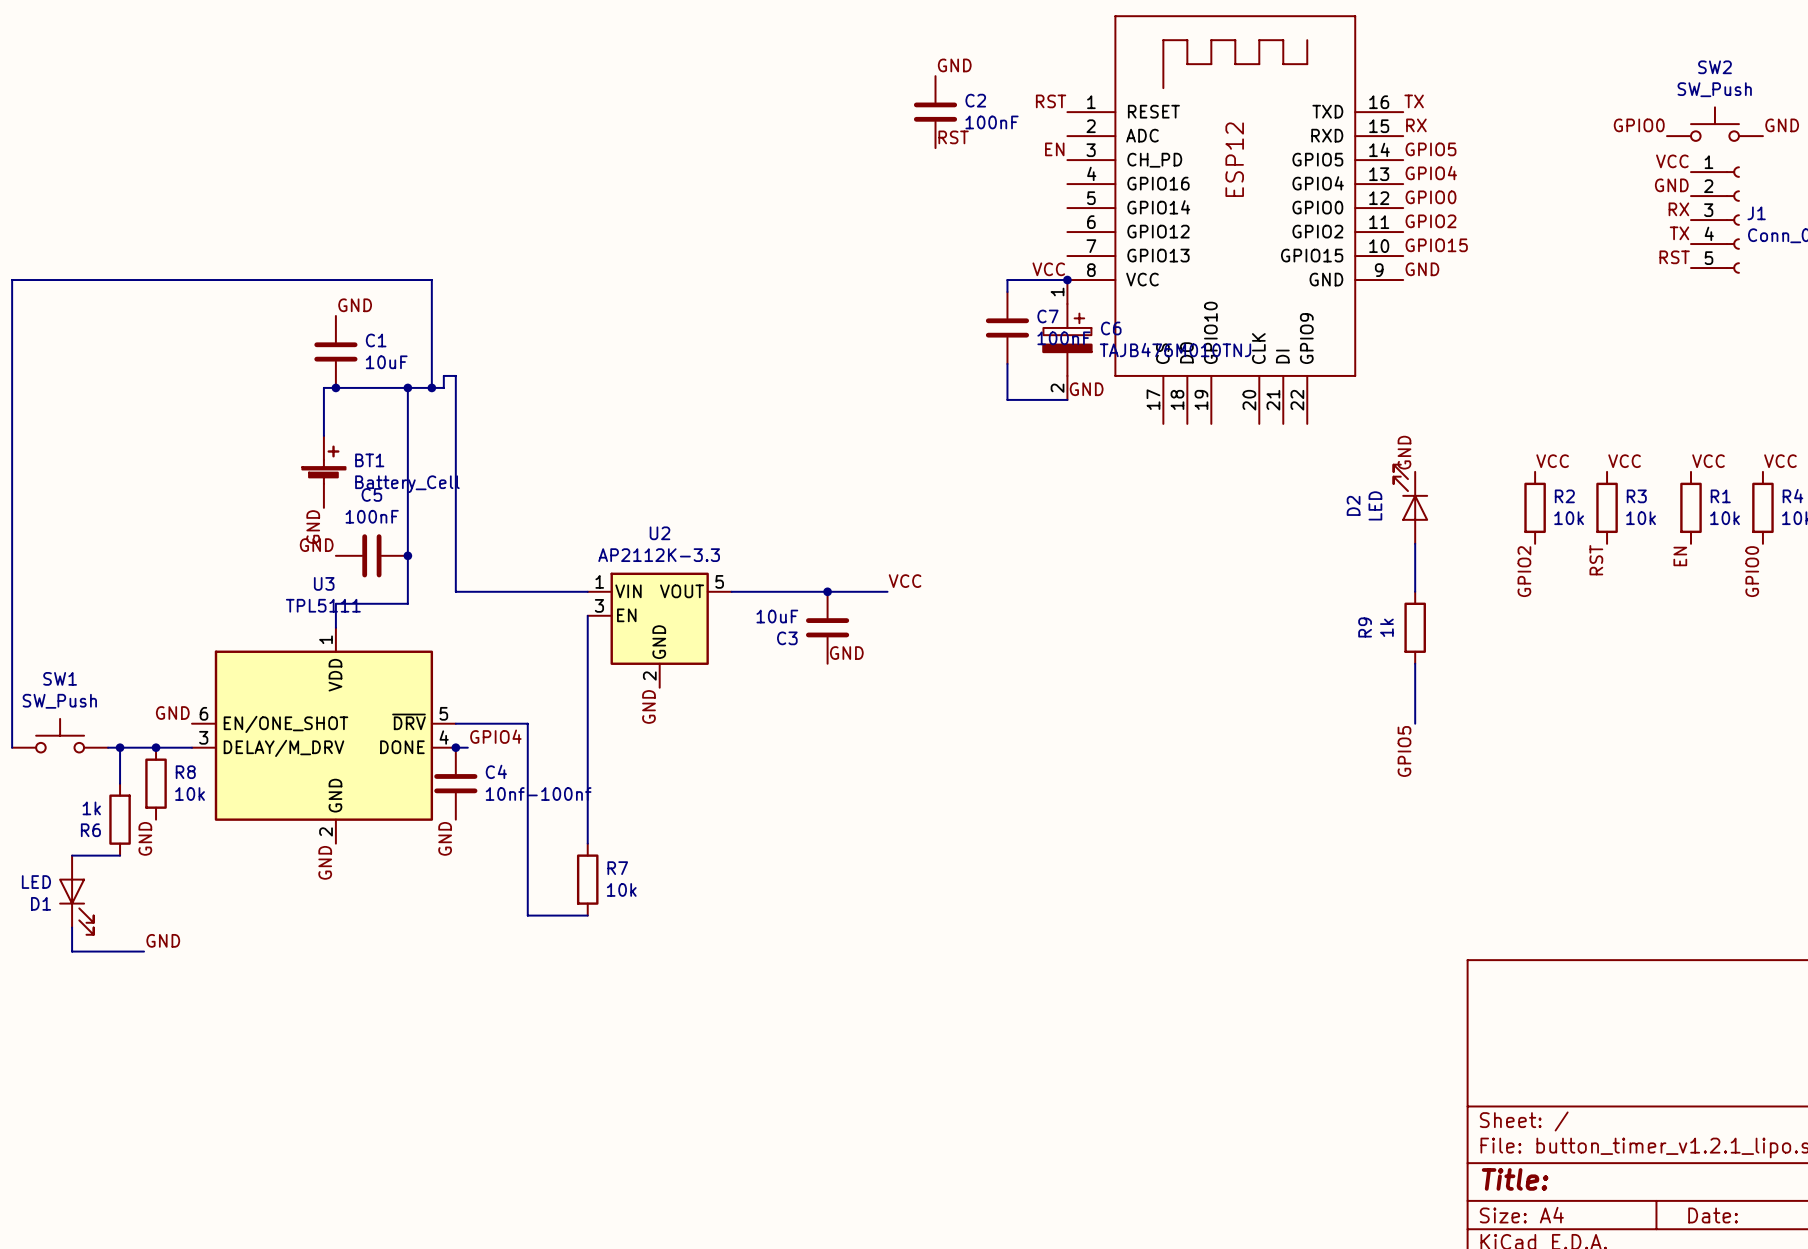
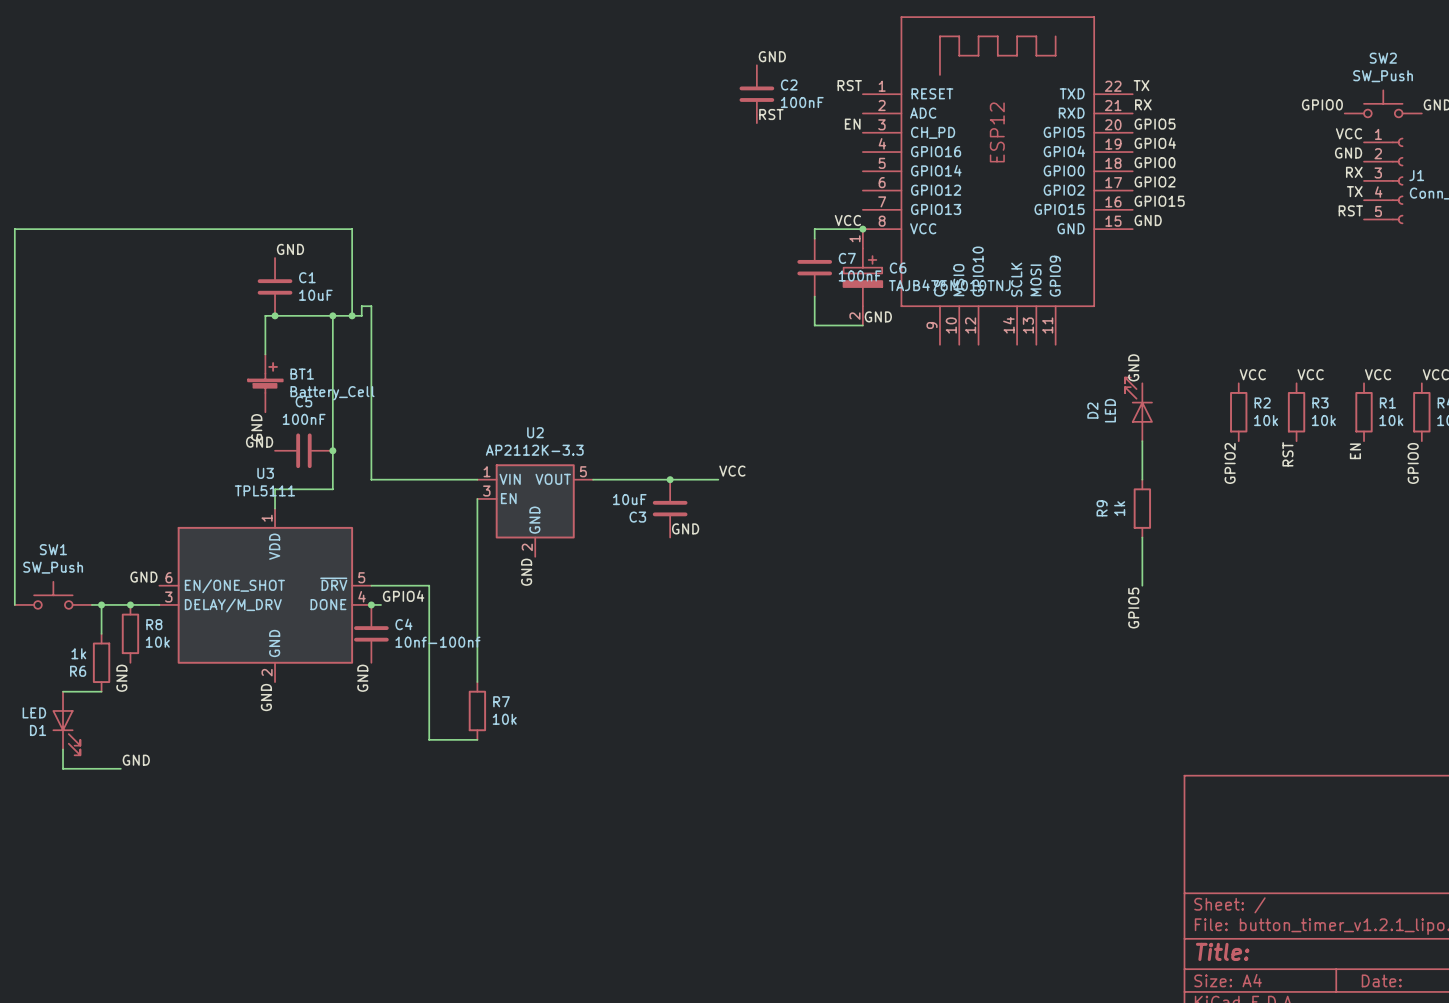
part symbol: [1067, 16, 1404, 424] -> [862, 17, 1133, 345]

